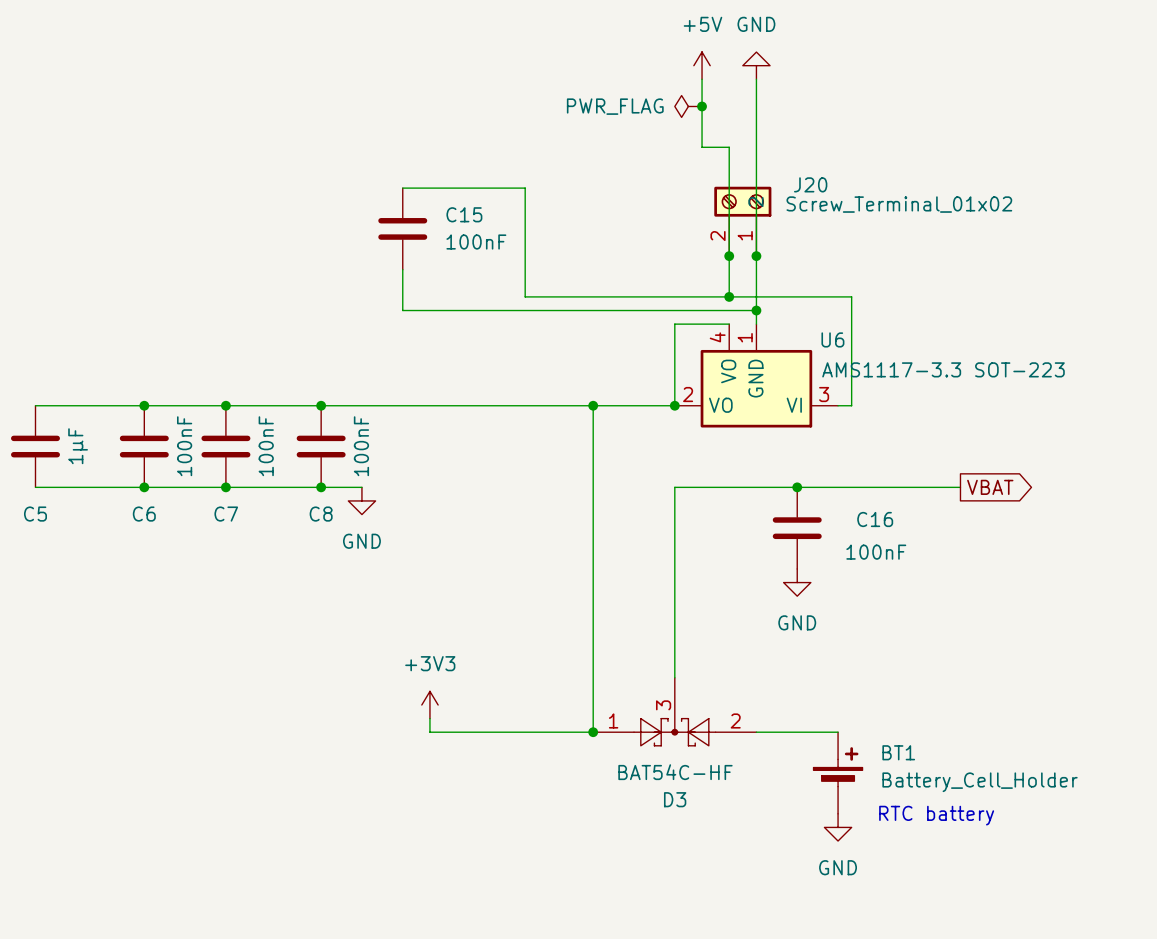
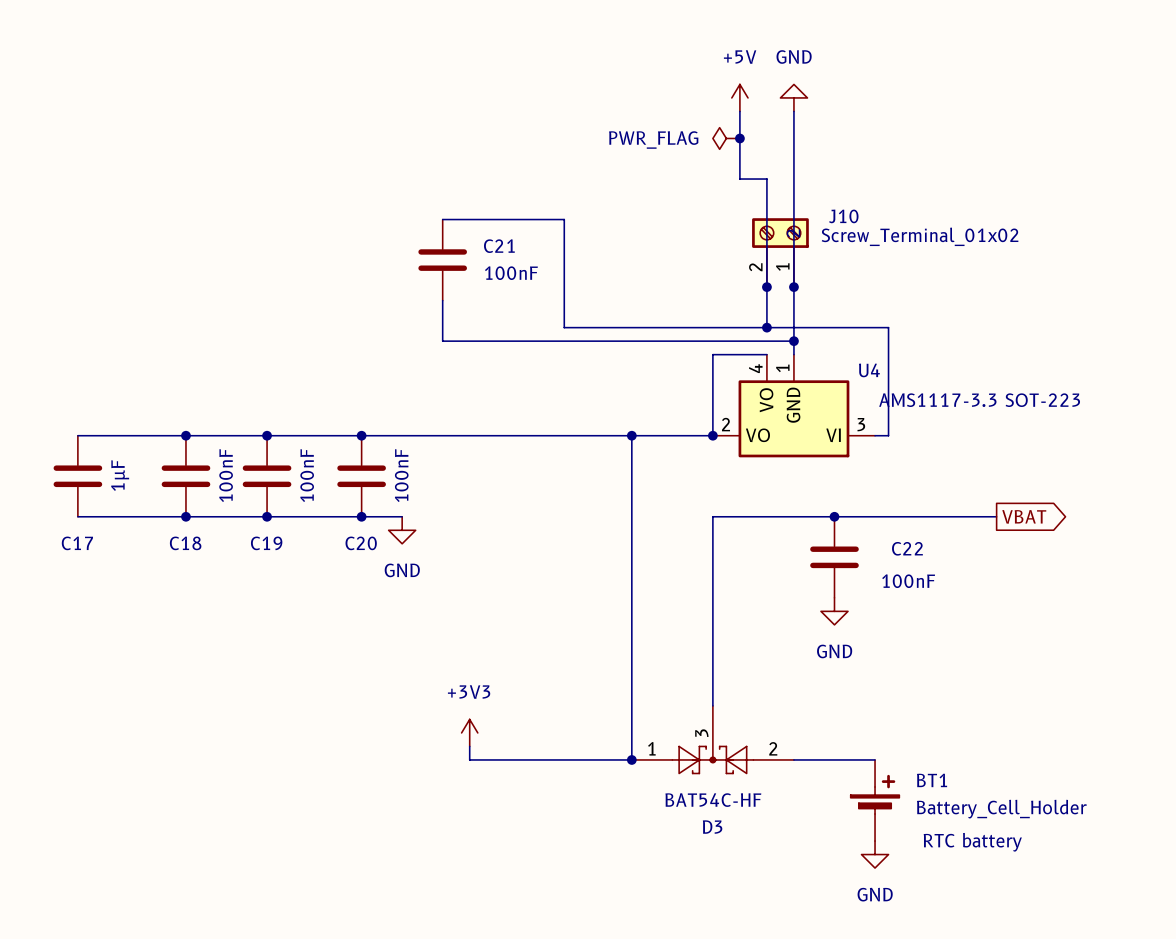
J20 name: J20 (810, 184) -> J10 (843, 216)
C15 name: C15 (464, 214) -> C21 (499, 246)
U6 name: U6 (832, 339) -> U4 (869, 370)
C5 name: C5 (35, 514) -> C17 (77, 543)
C6 name: C6 (144, 514) -> C18 (185, 543)
C7 name: C7 (226, 514) -> C19 (266, 543)
C8 name: C8 (321, 514) -> C20 (361, 543)
C16 name: C16 (875, 519) -> C22 (907, 548)

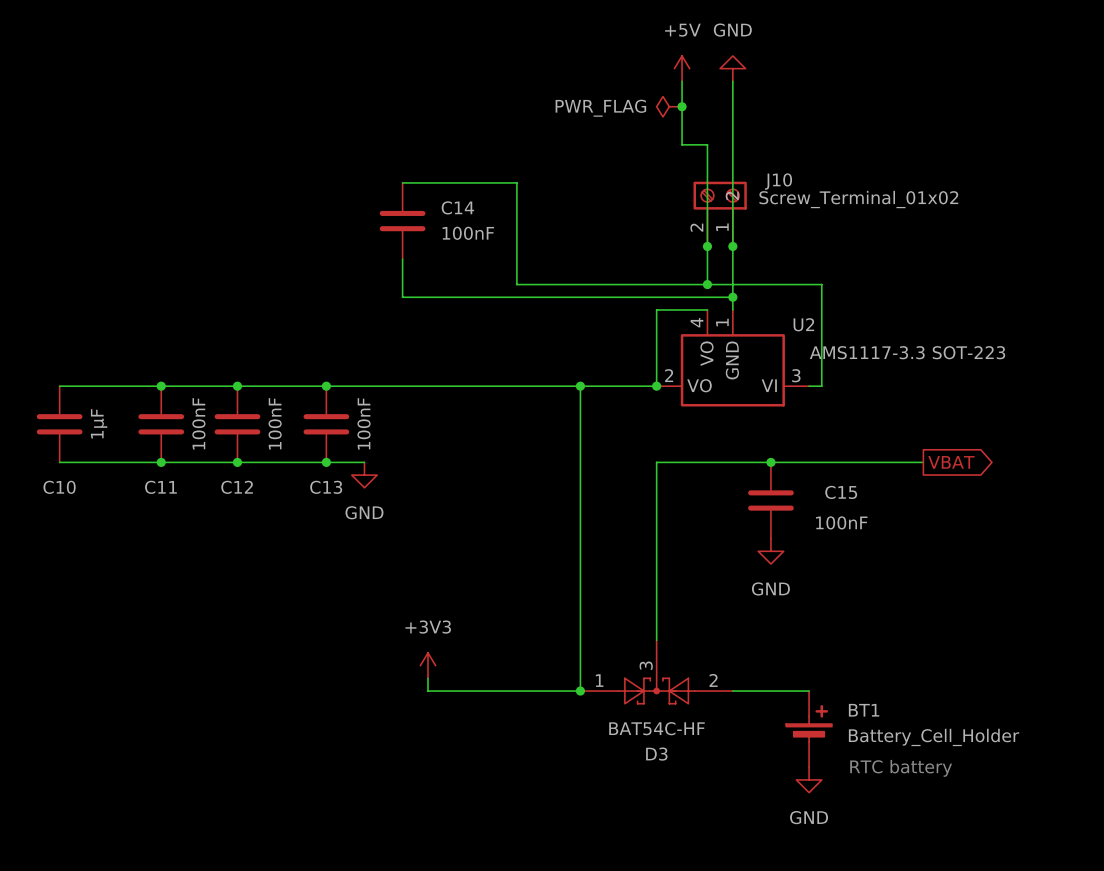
C21 name: C21 (499, 246) -> C14 (457, 207)
U4 name: U4 (869, 370) -> U2 (803, 324)
C17 name: C17 (77, 543) -> C10 (59, 487)
C18 name: C18 (185, 543) -> C11 (160, 487)
C19 name: C19 (266, 543) -> C12 (237, 487)
C20 name: C20 (361, 543) -> C13 (326, 487)
C22 name: C22 (907, 548) -> C15 (841, 492)

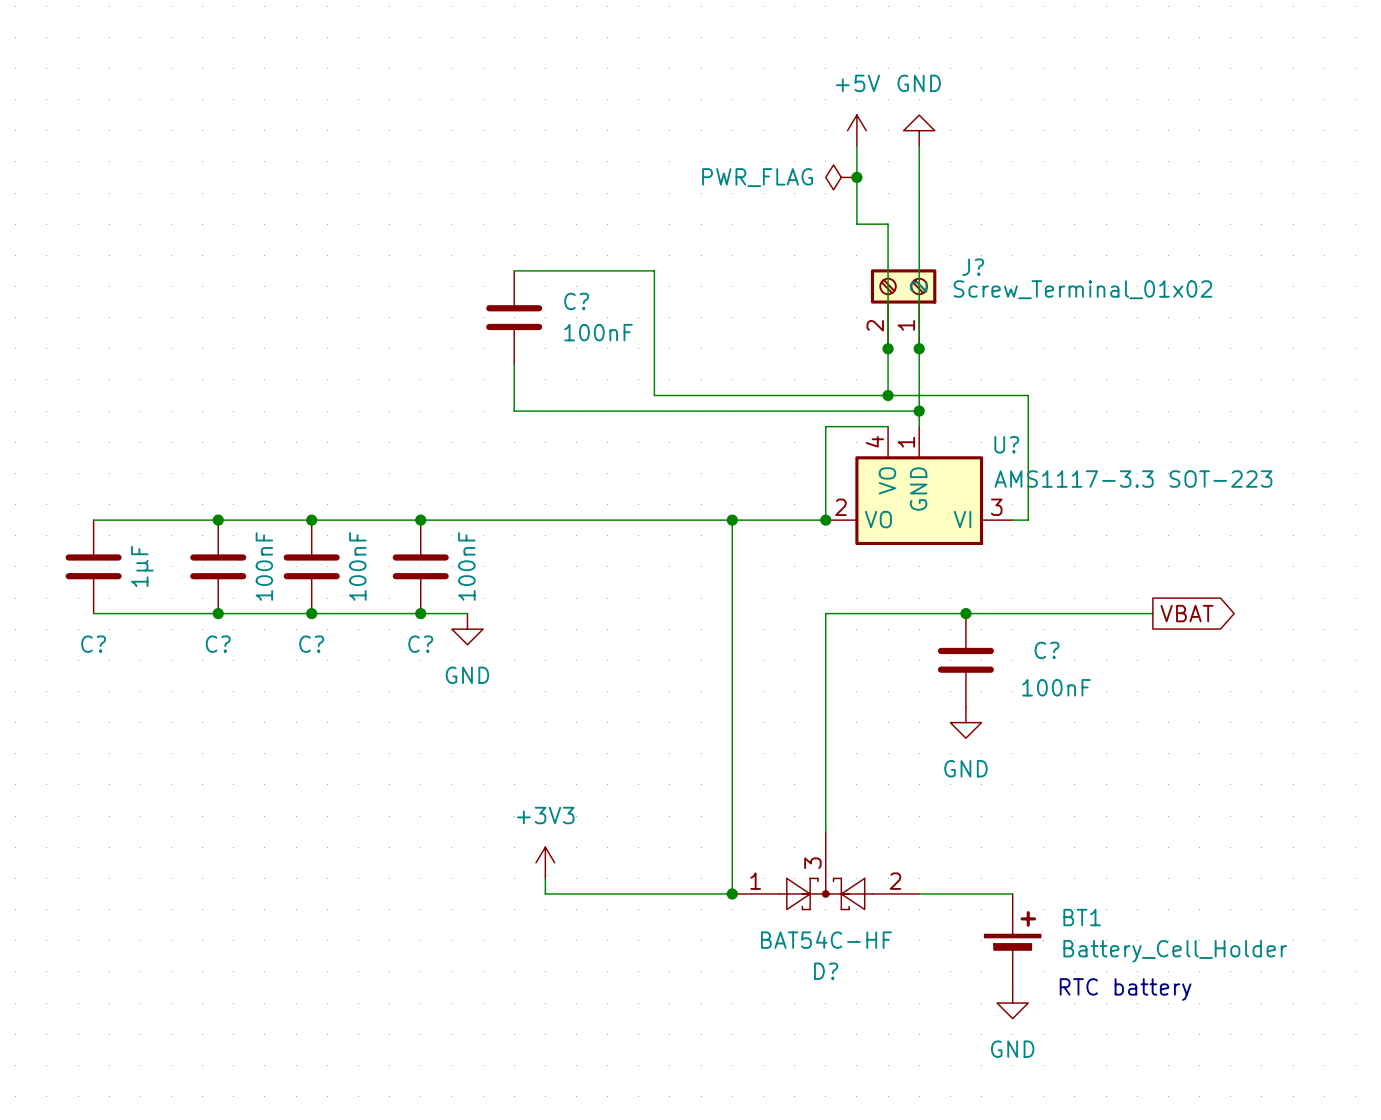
J10 name: J10 (778, 181) -> J? (973, 267)
C14 name: C14 (457, 207) -> C? (576, 301)
U2 name: U2 (803, 324) -> U? (1006, 444)
C10 name: C10 (59, 487) -> C? (93, 644)
C11 name: C11 (160, 487) -> C? (218, 644)
C12 name: C12 (237, 487) -> C? (311, 644)
C13 name: C13 (326, 487) -> C? (420, 644)
C15 name: C15 (841, 492) -> C? (1047, 650)
D3 name: D3 (656, 754) -> D? (826, 971)

